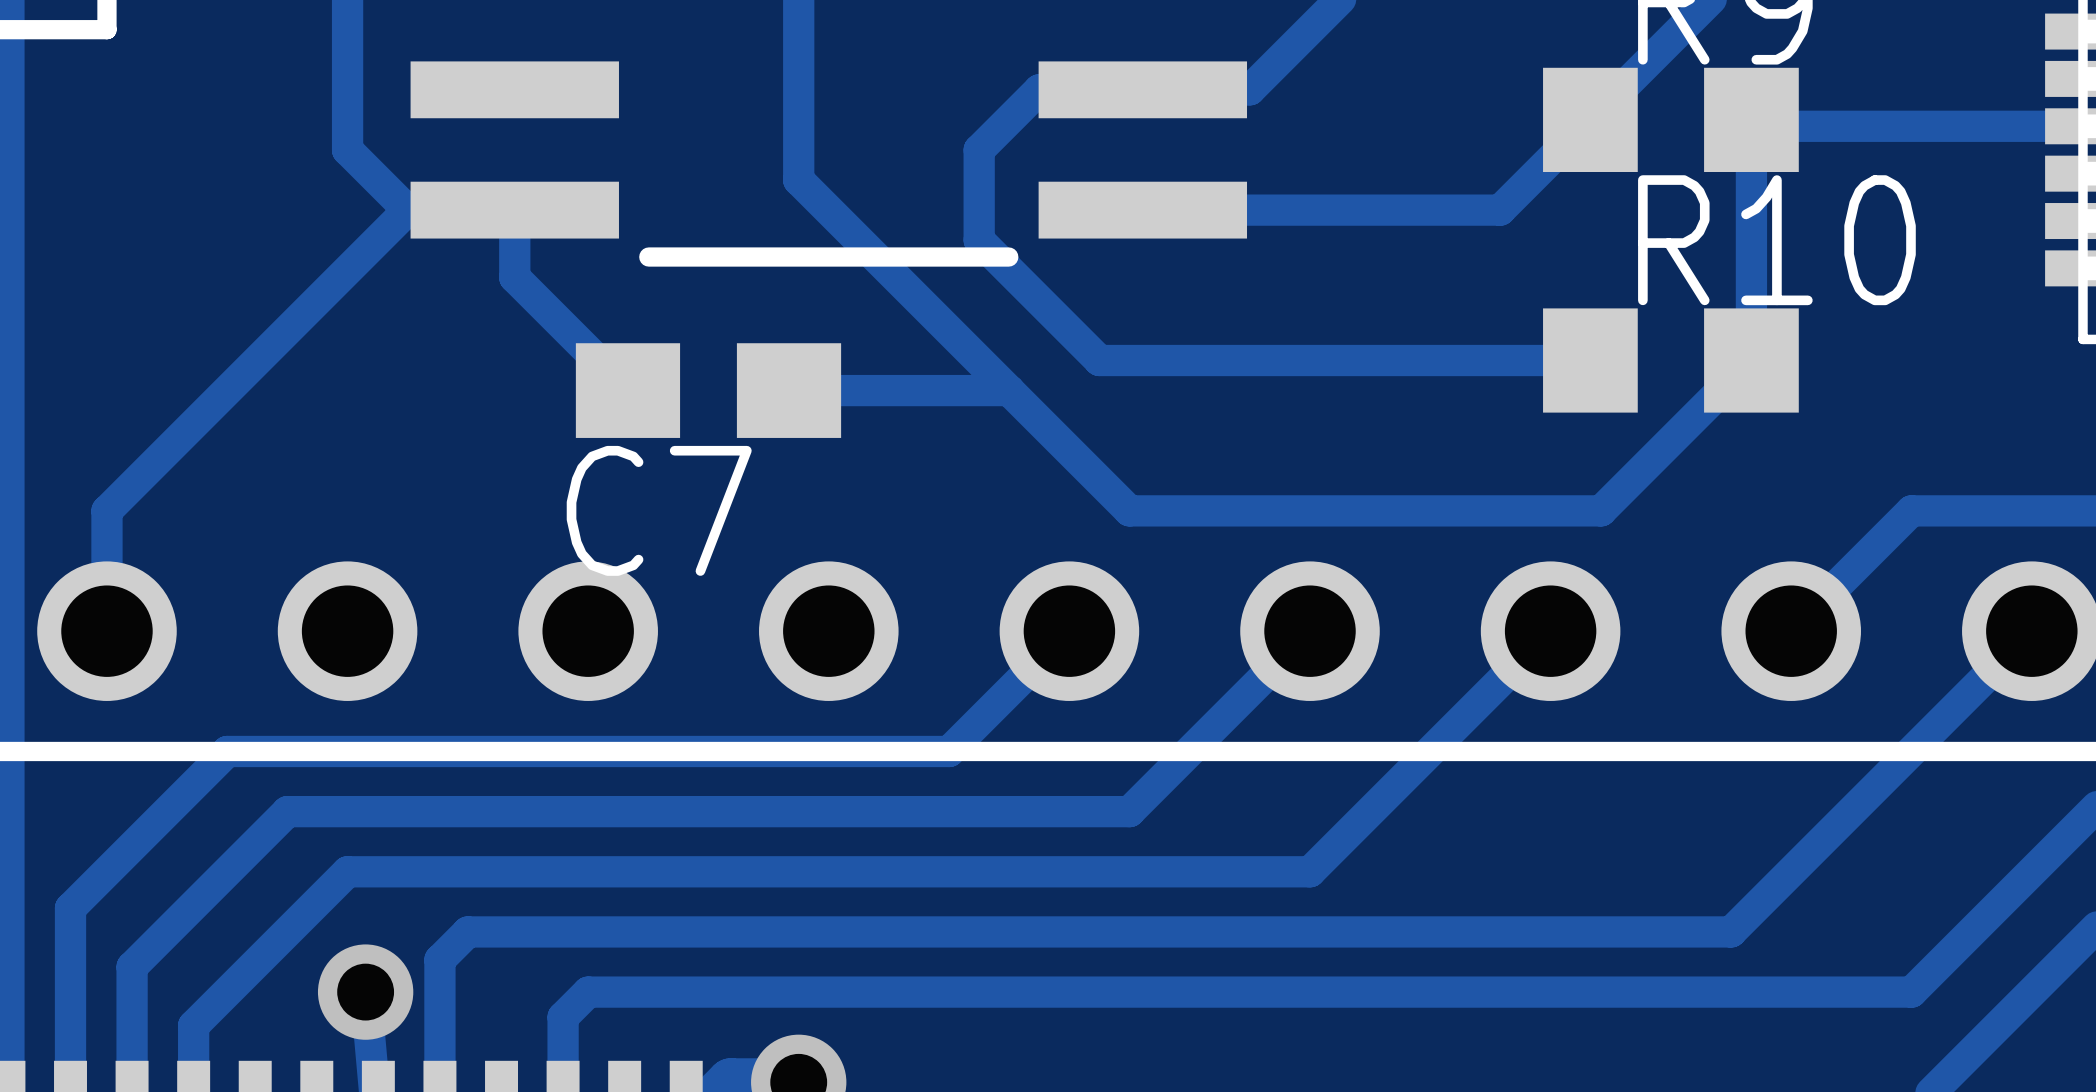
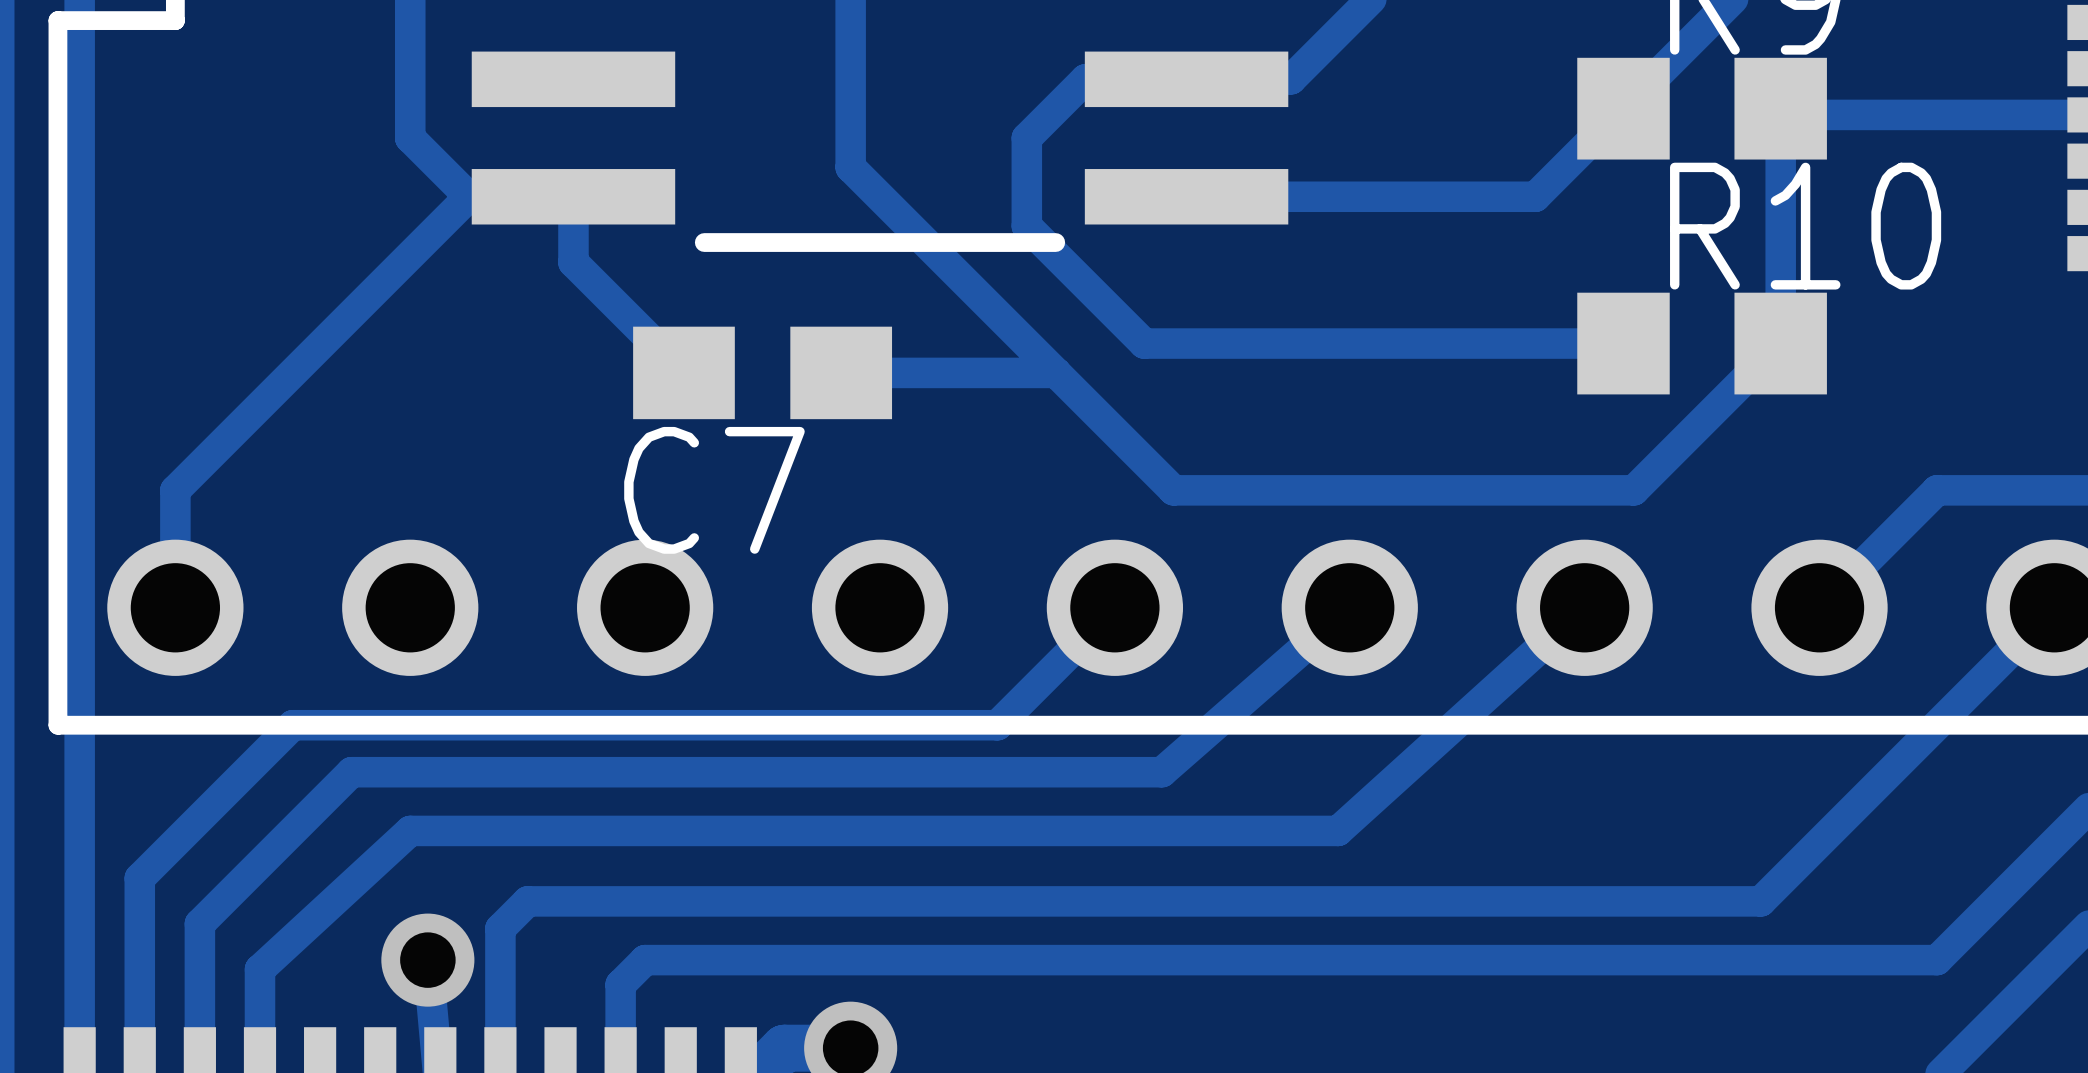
track: (1310, 631) (1129, 811) (287, 811) (132, 966) -> (1349, 607) (1161, 772) (351, 772) (199, 923) (199, 935)
track: (1550, 631) (1310, 871) (347, 871) (193, 1025) -> (1584, 607) (1338, 830) (410, 830) (259, 969) (259, 992)

